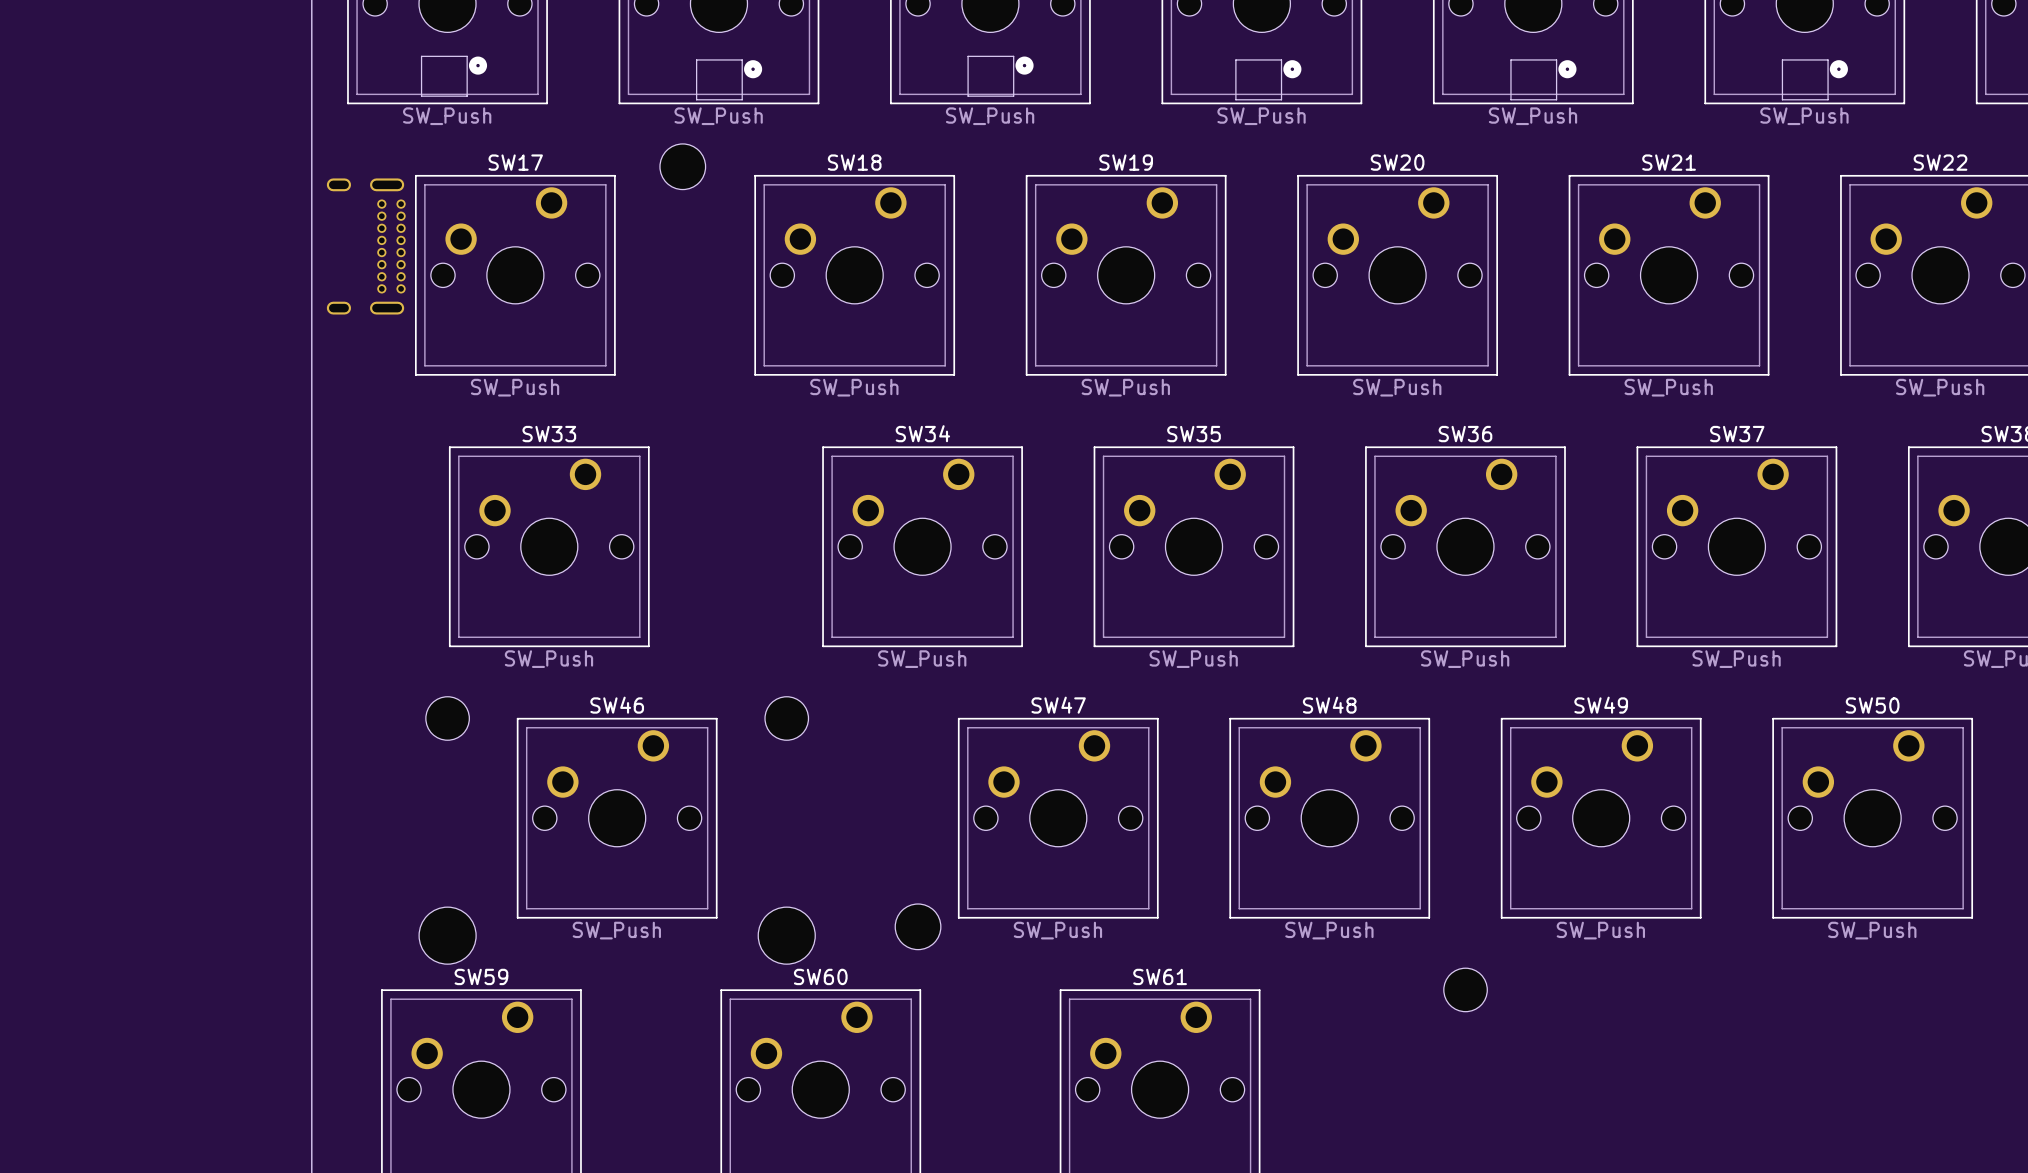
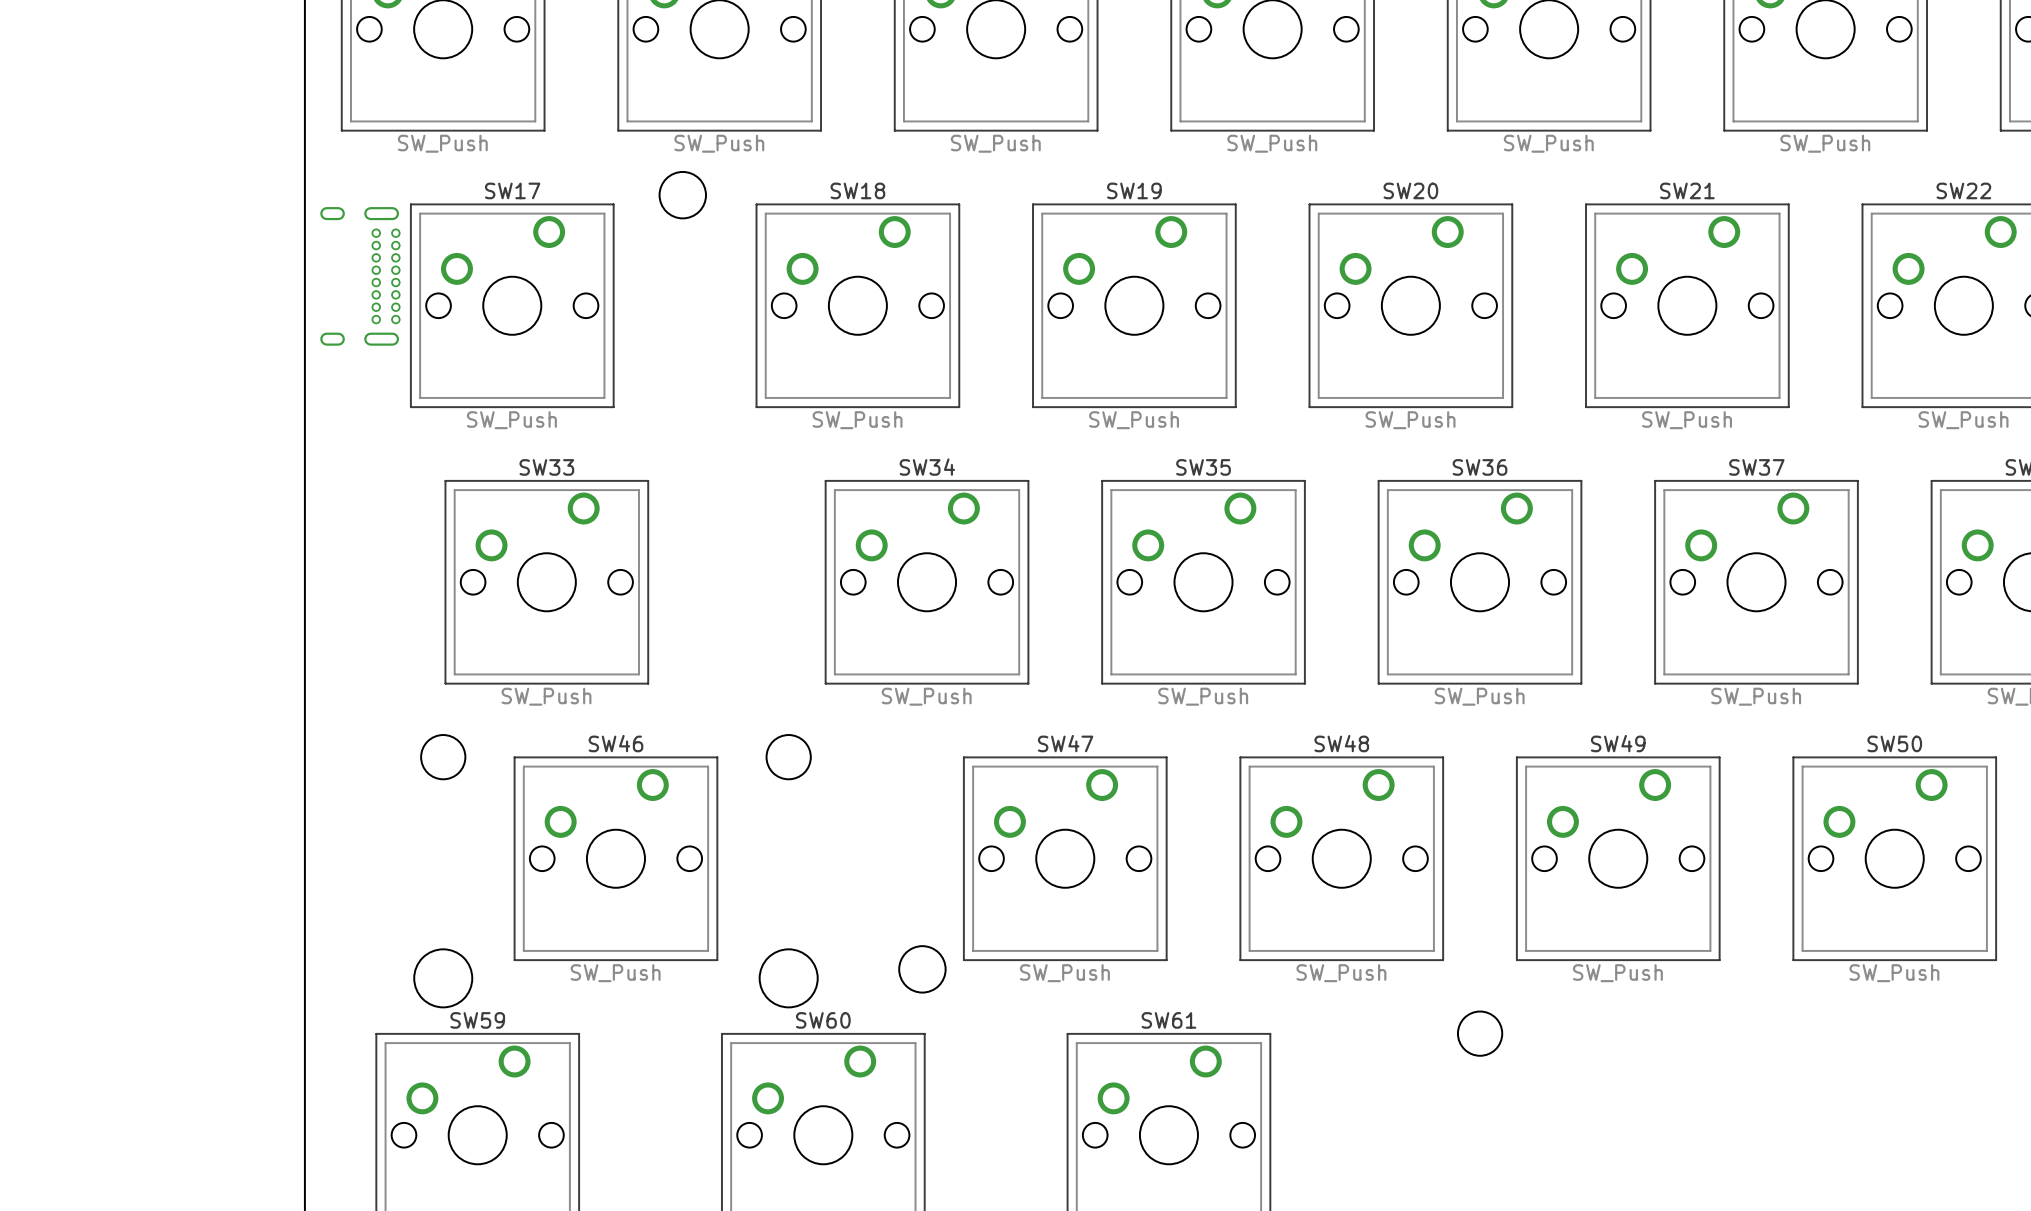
part: (454, 76) -> none
part: (1000, 76) -> none
part: (729, 79) -> none
part: (1268, 79) -> none
part: (1543, 79) -> none
part: (1815, 79) -> none

